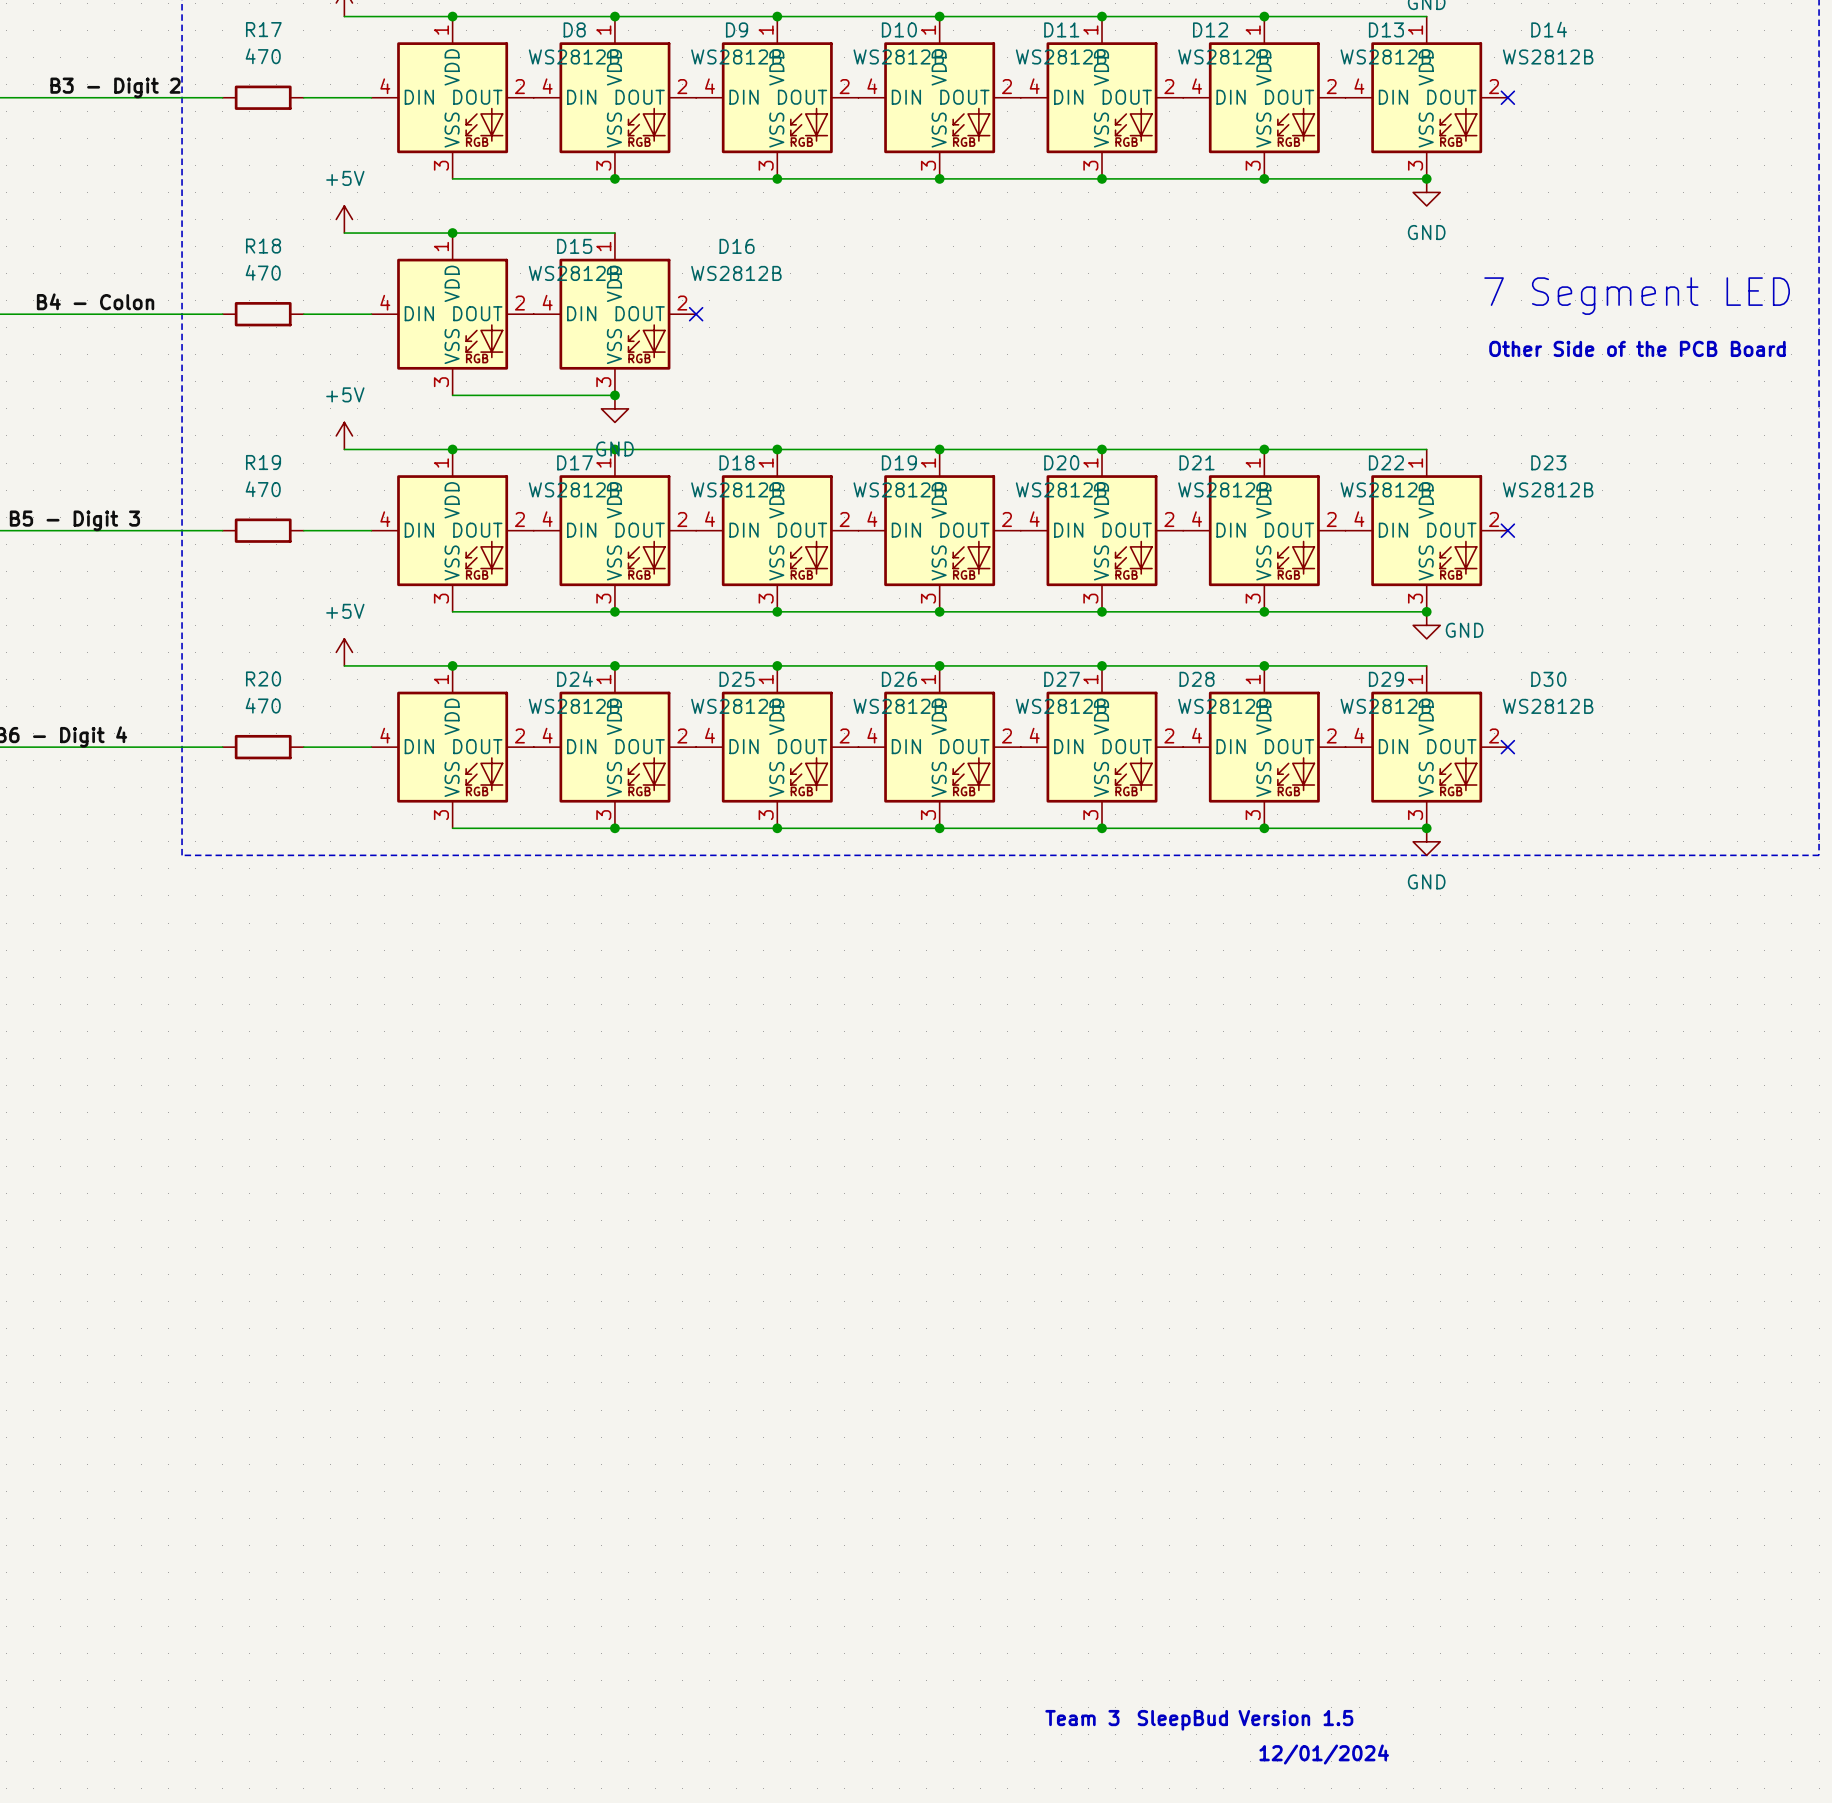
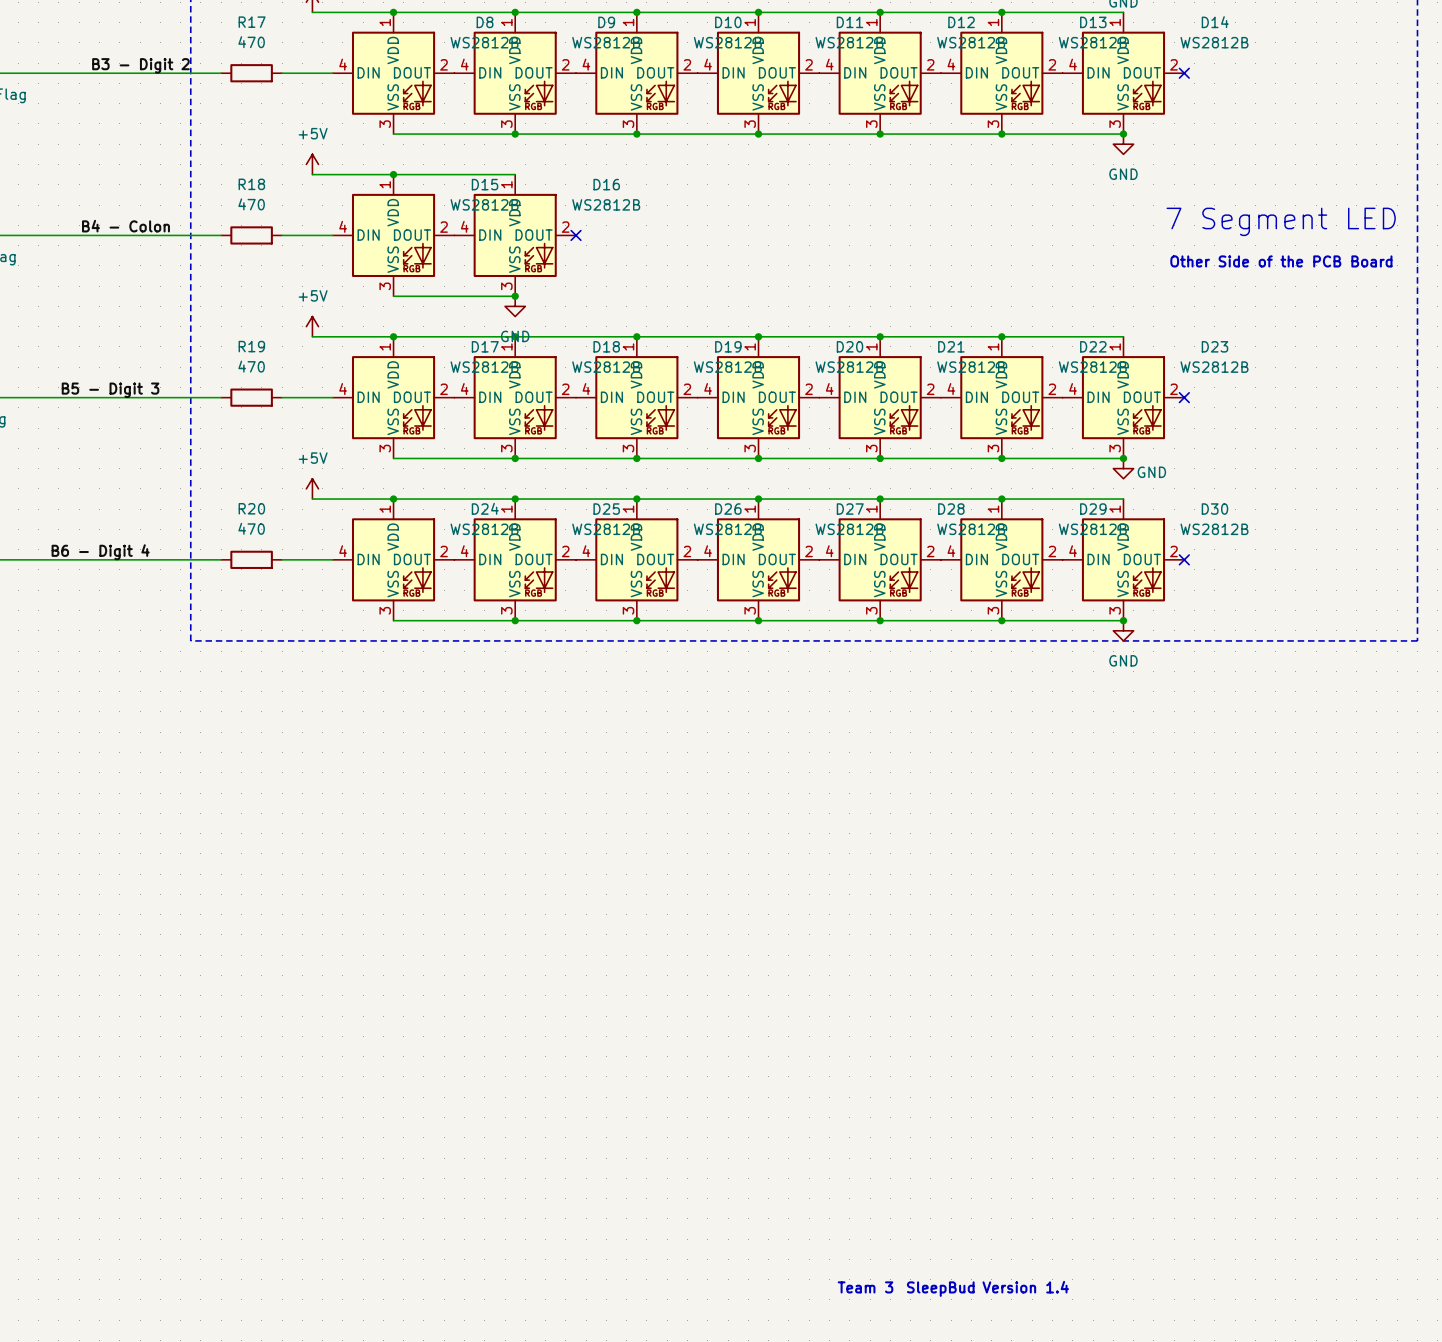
text: Version 1.5 (1295, 1718) -> Version 1.4 (1025, 1287)
text: 12/01/2024 (1324, 1754) -> none

